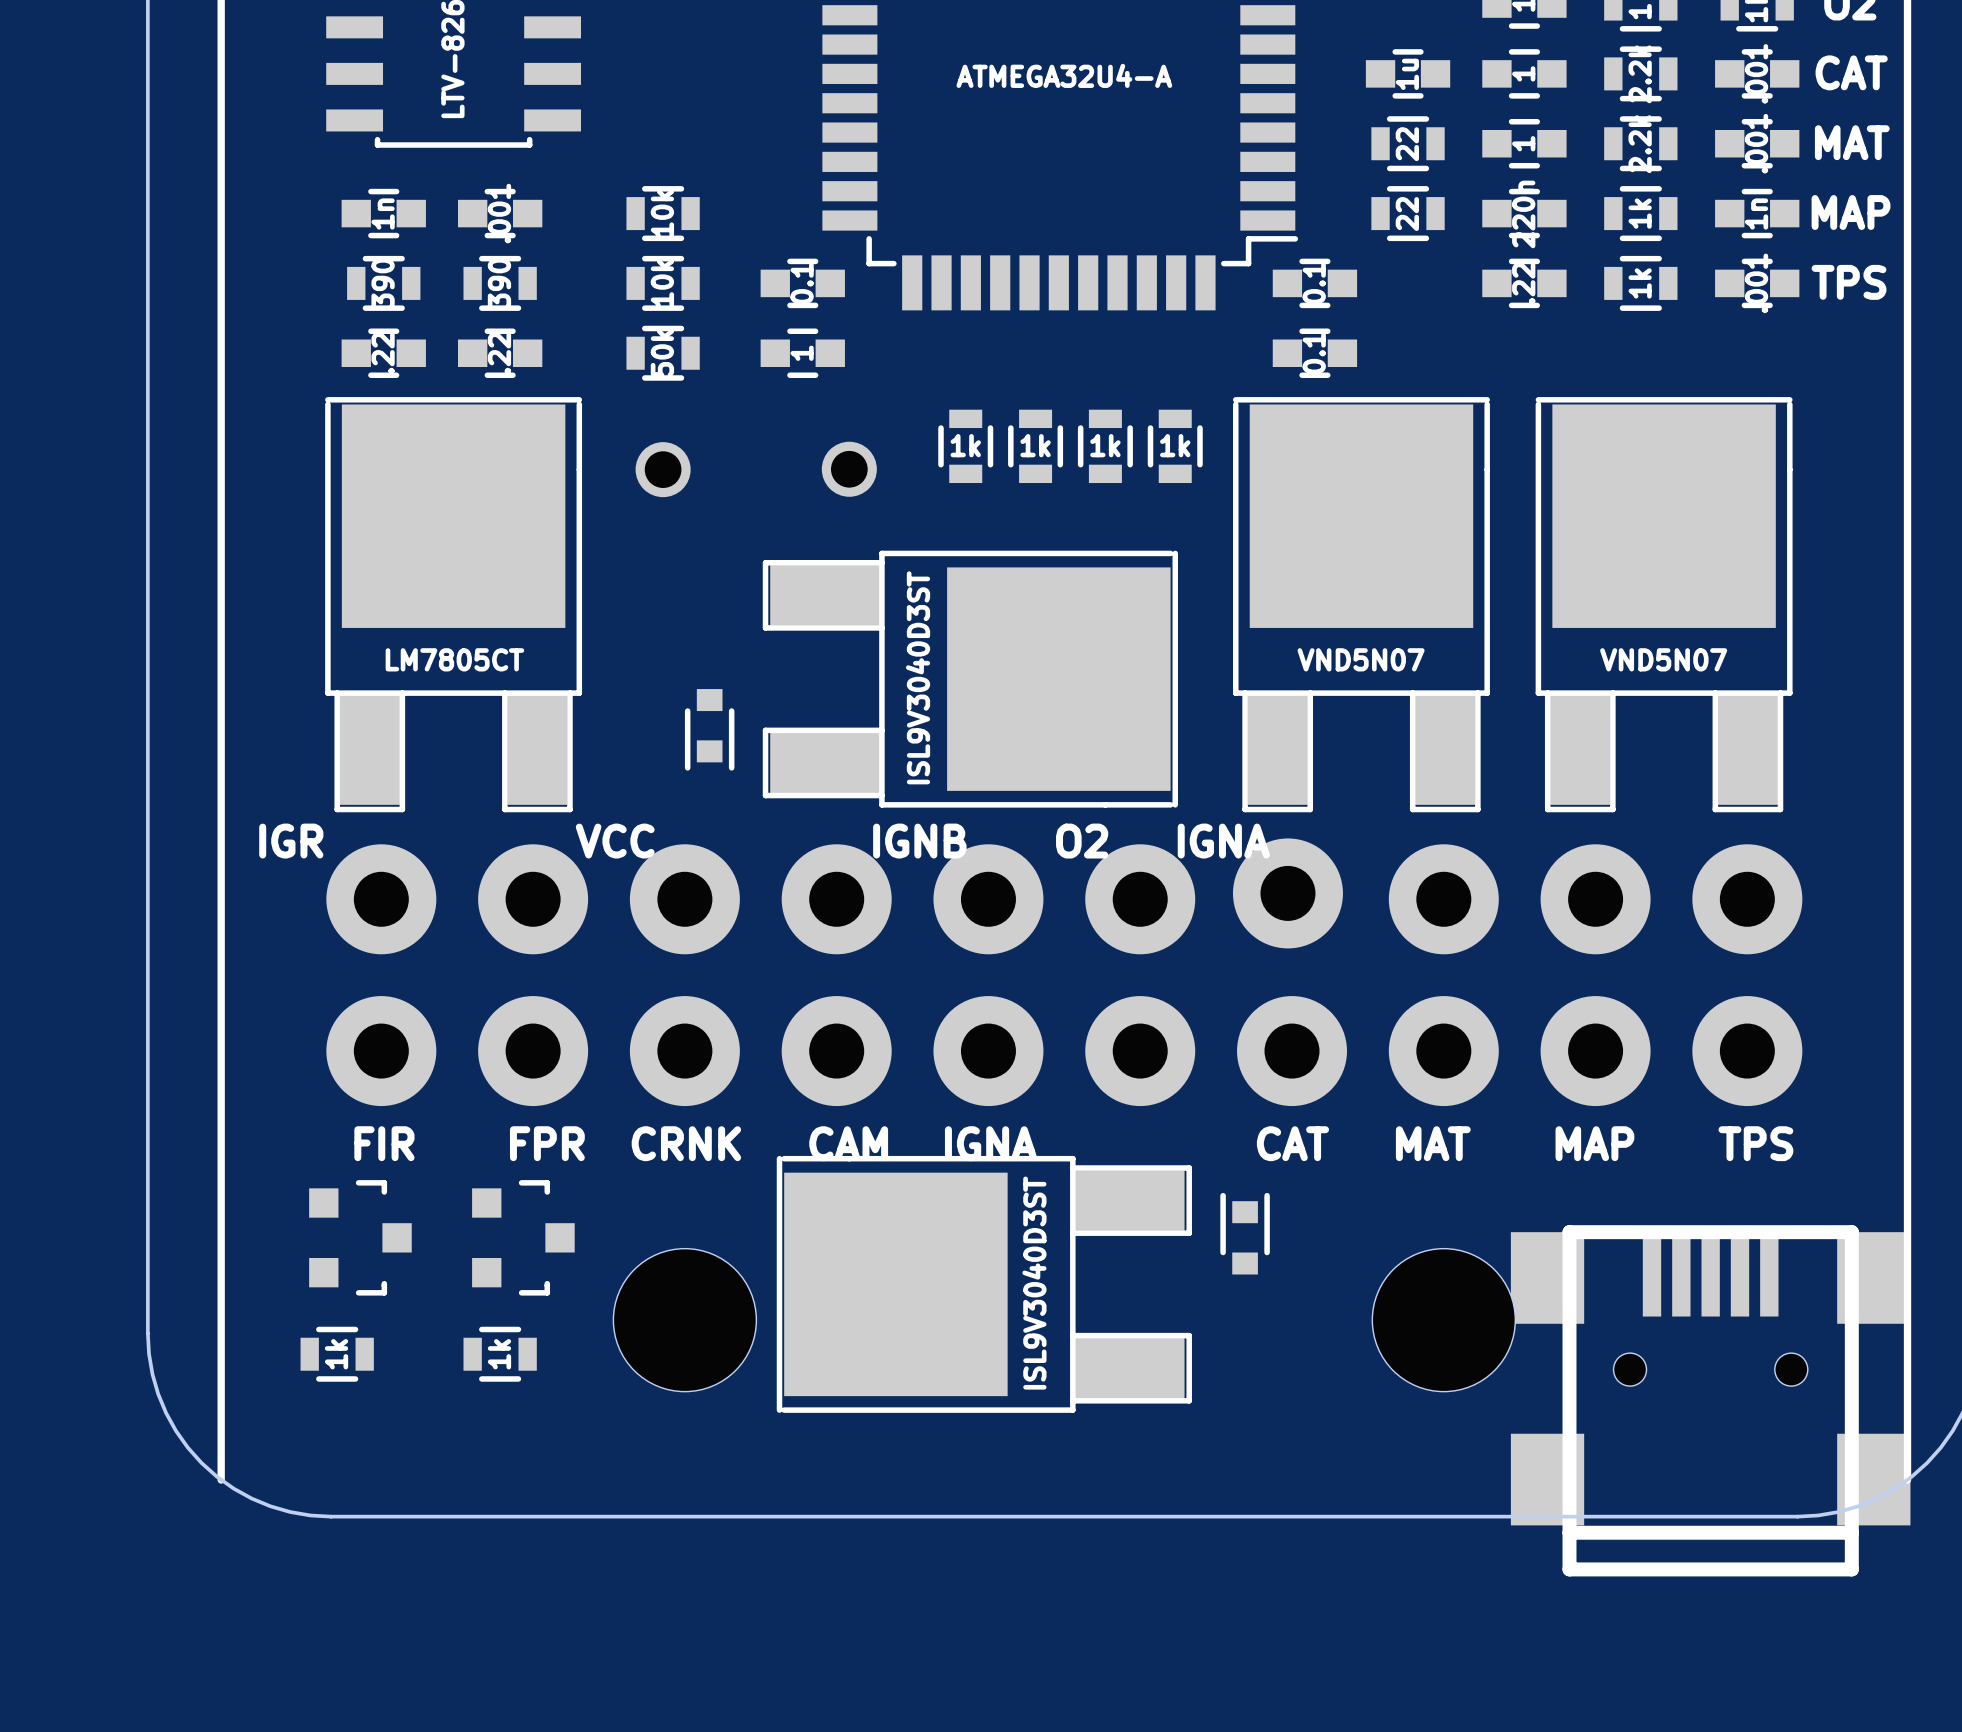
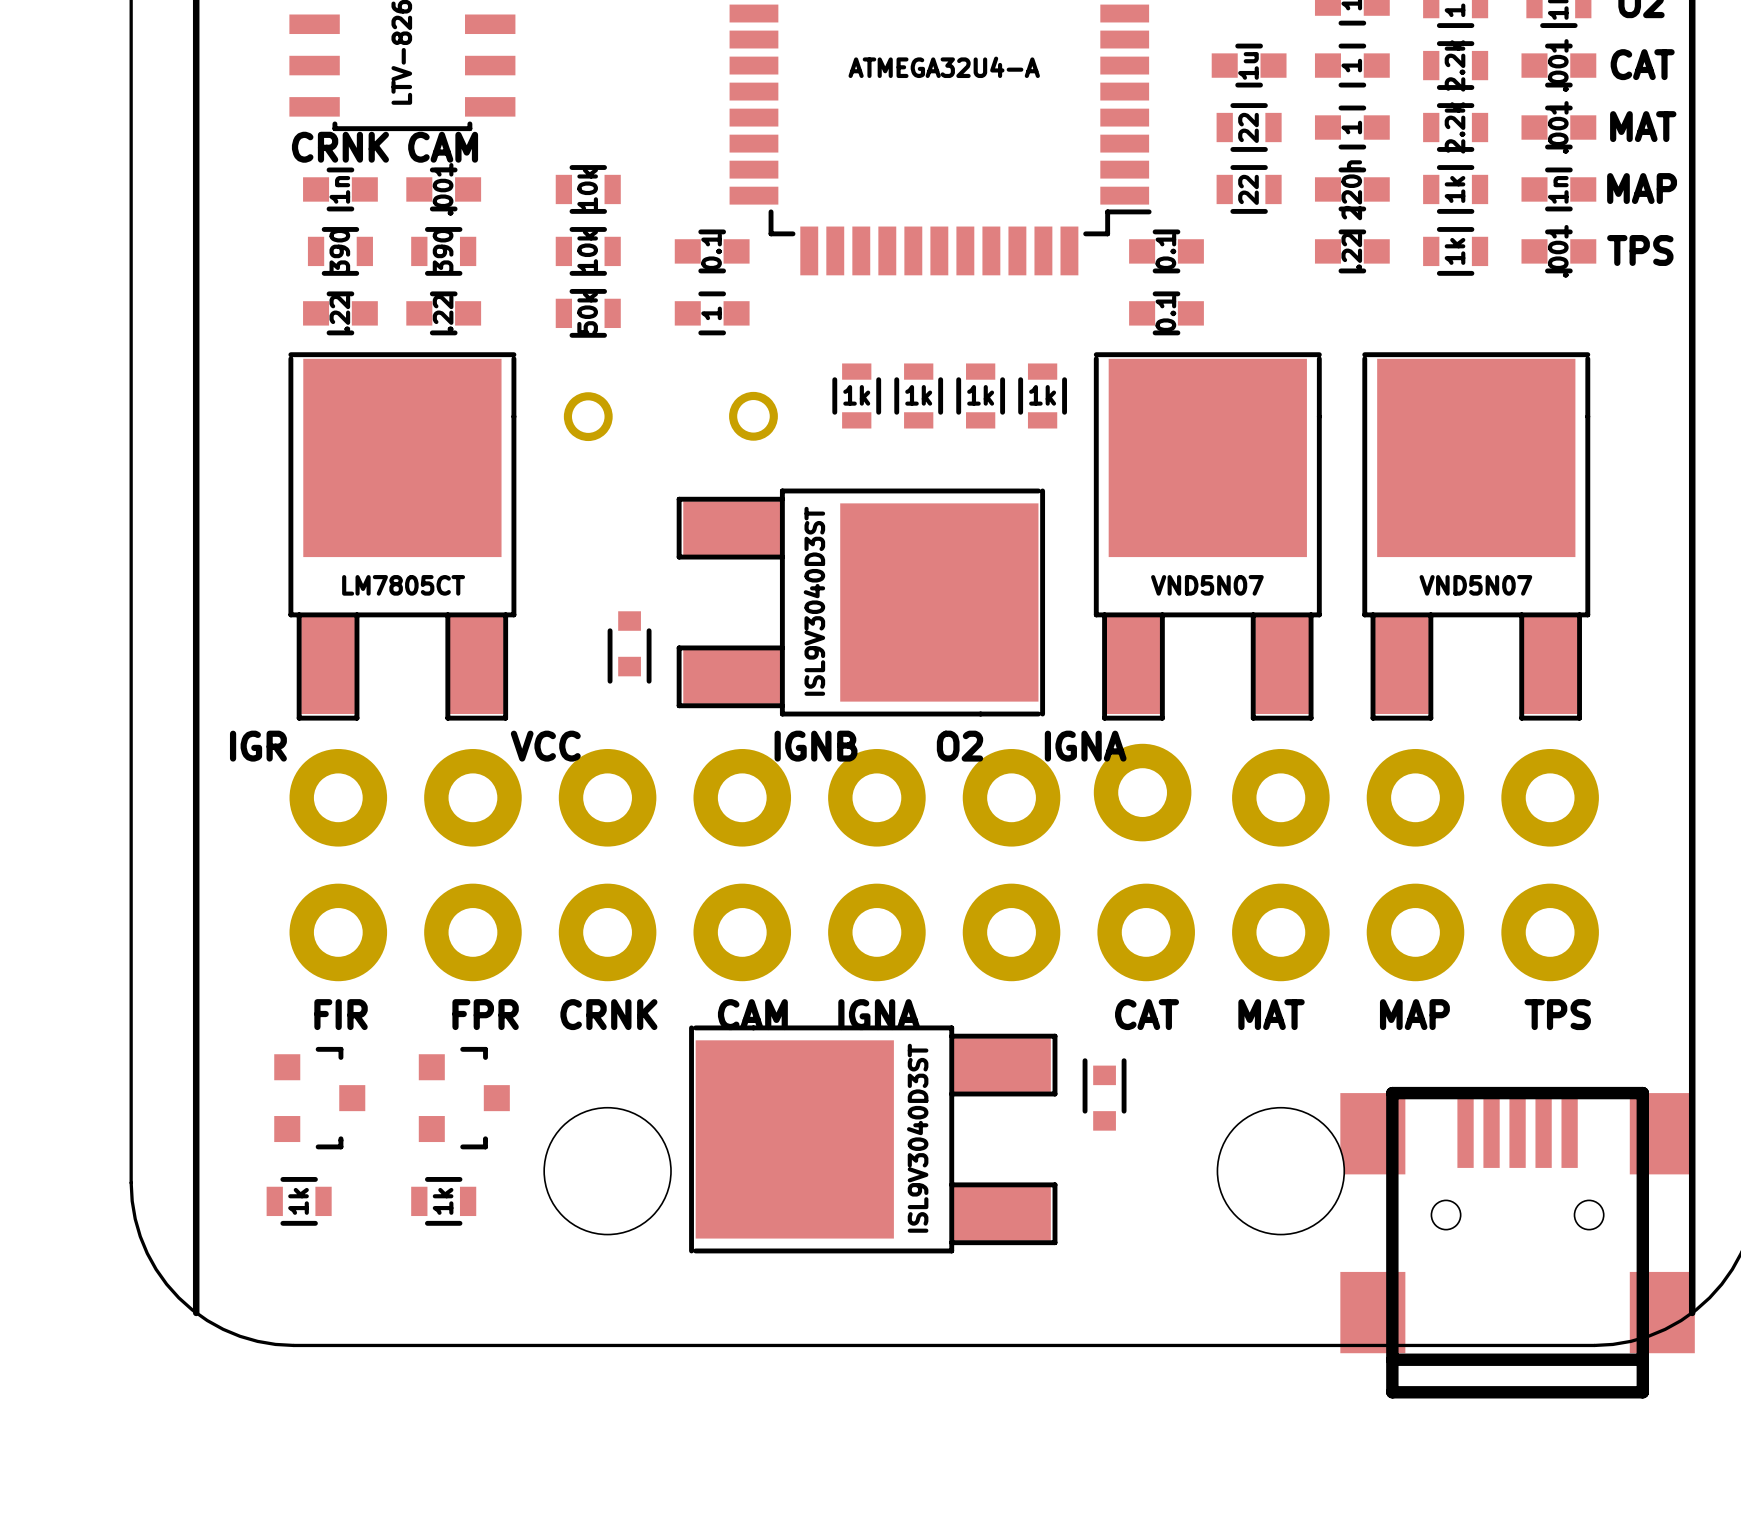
text: none -> CRNK (340, 147)
text: none -> CAM (443, 147)

